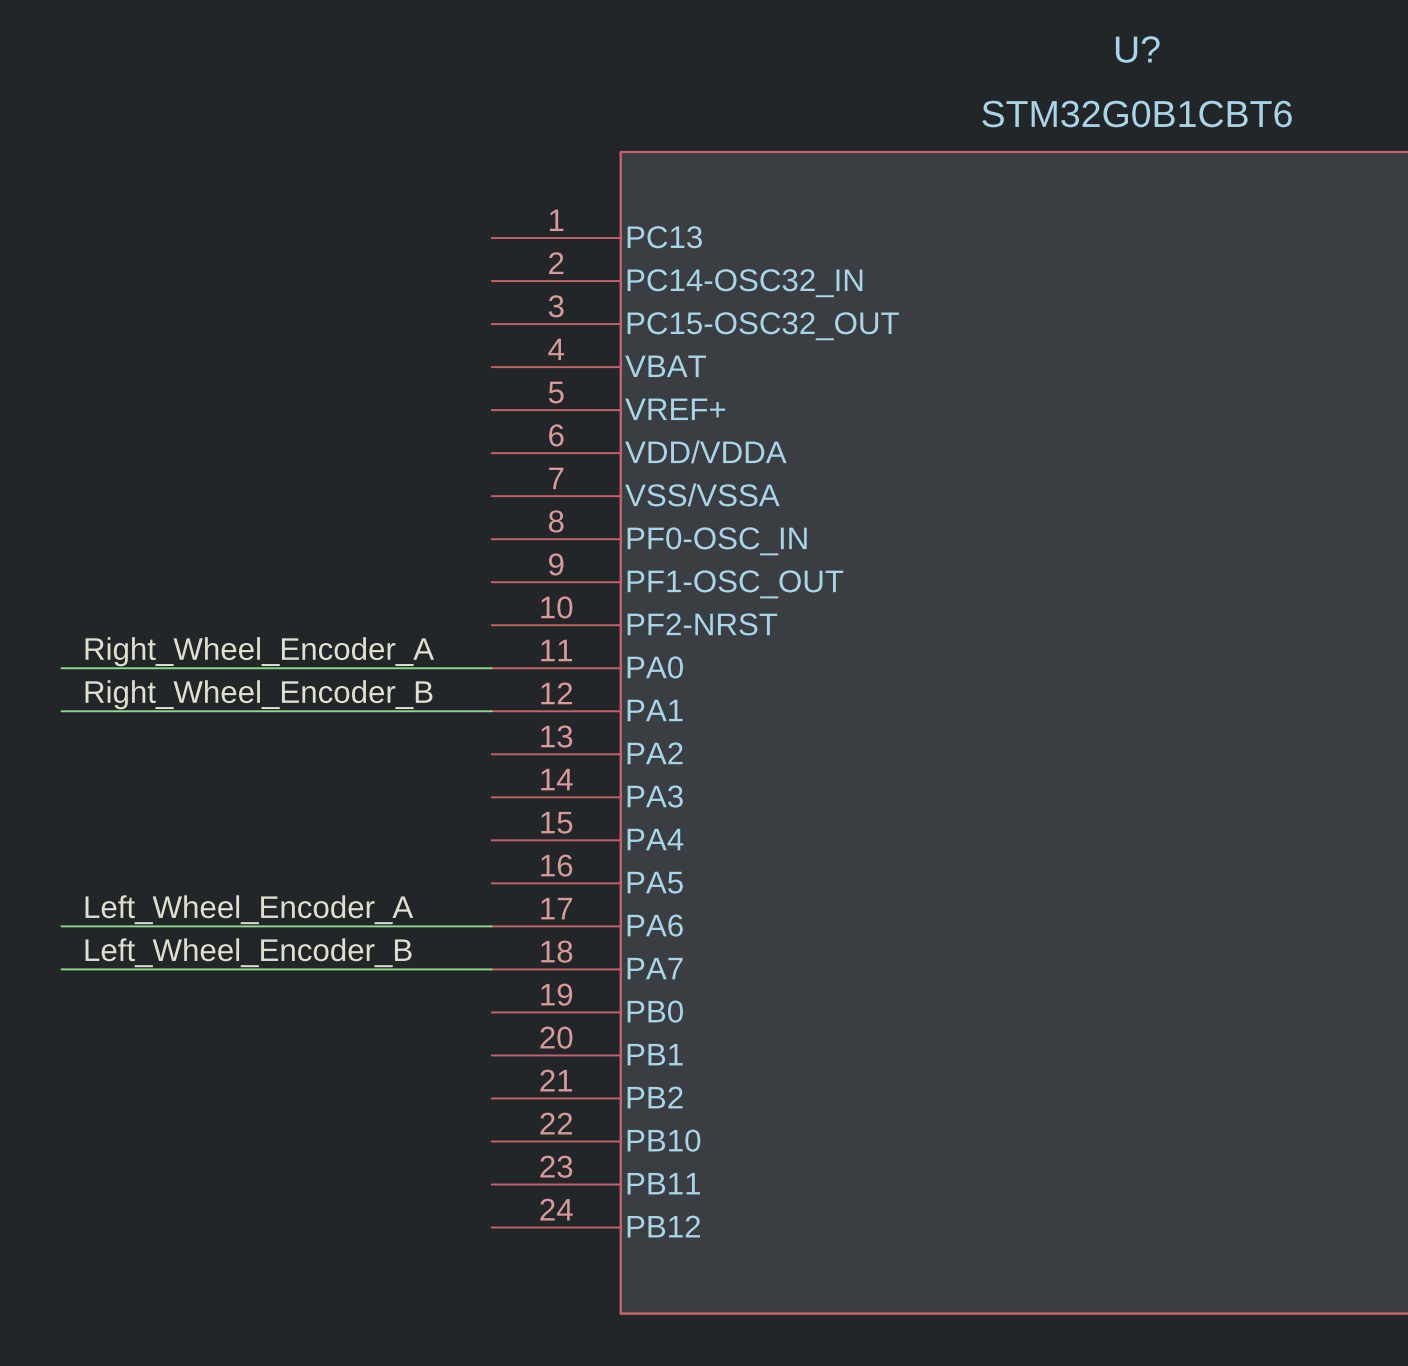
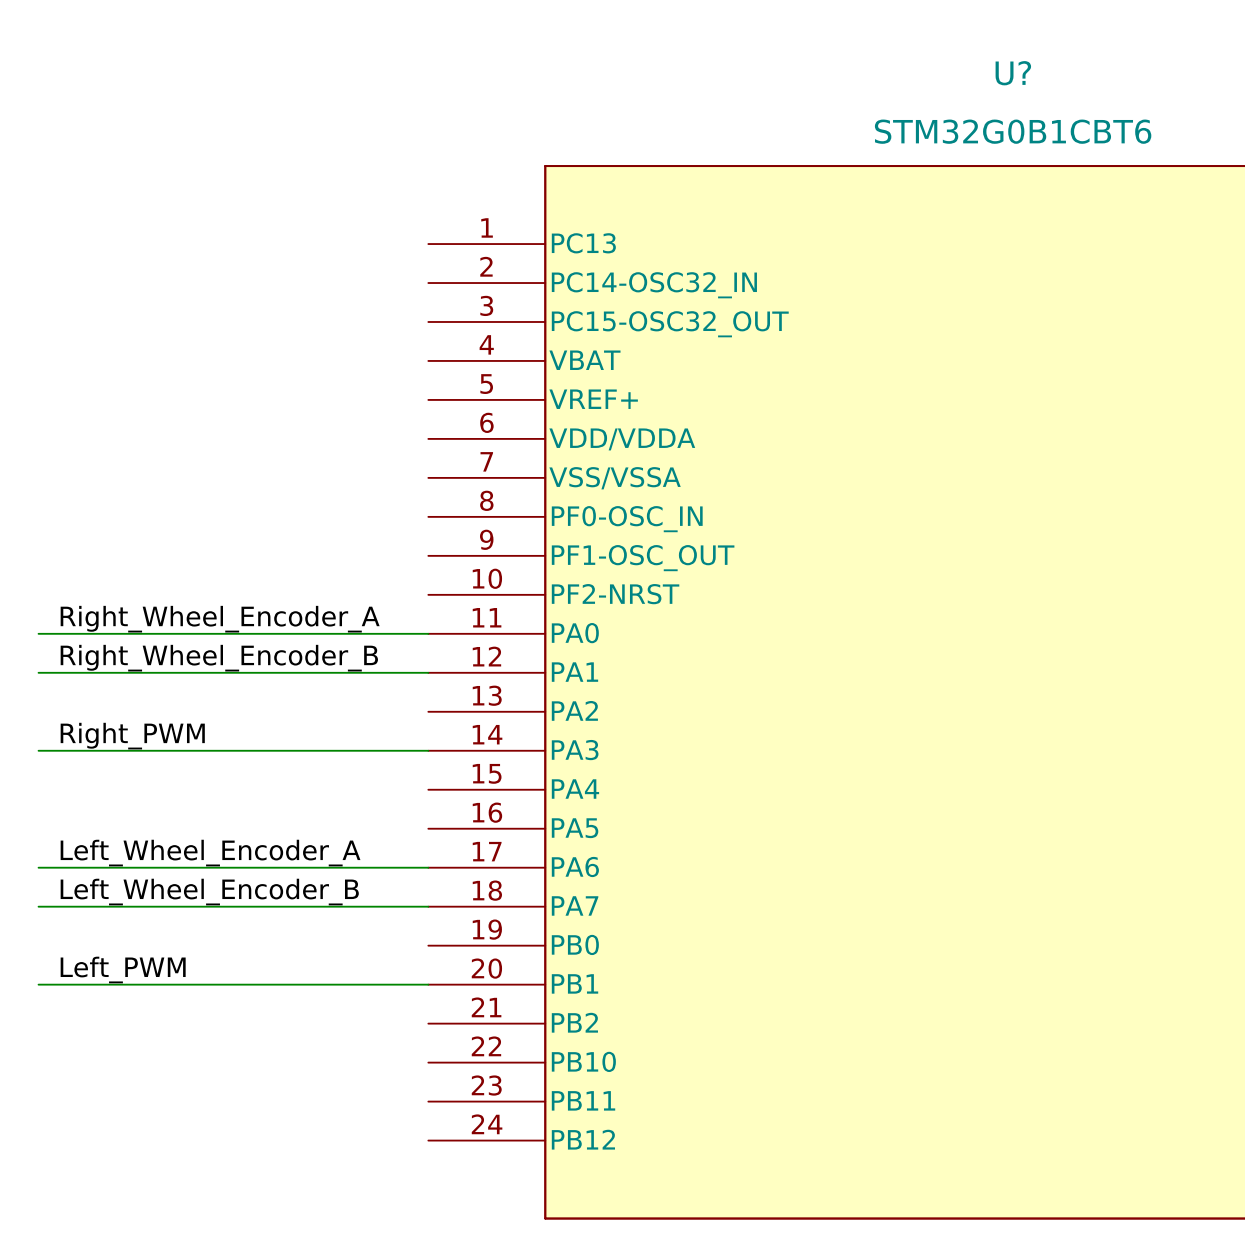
label: none -> Right_PWM (132, 736)
wire: none -> (38, 750) (428, 750)
label: none -> Left_PWM (123, 970)
wire: none -> (38, 984) (428, 984)

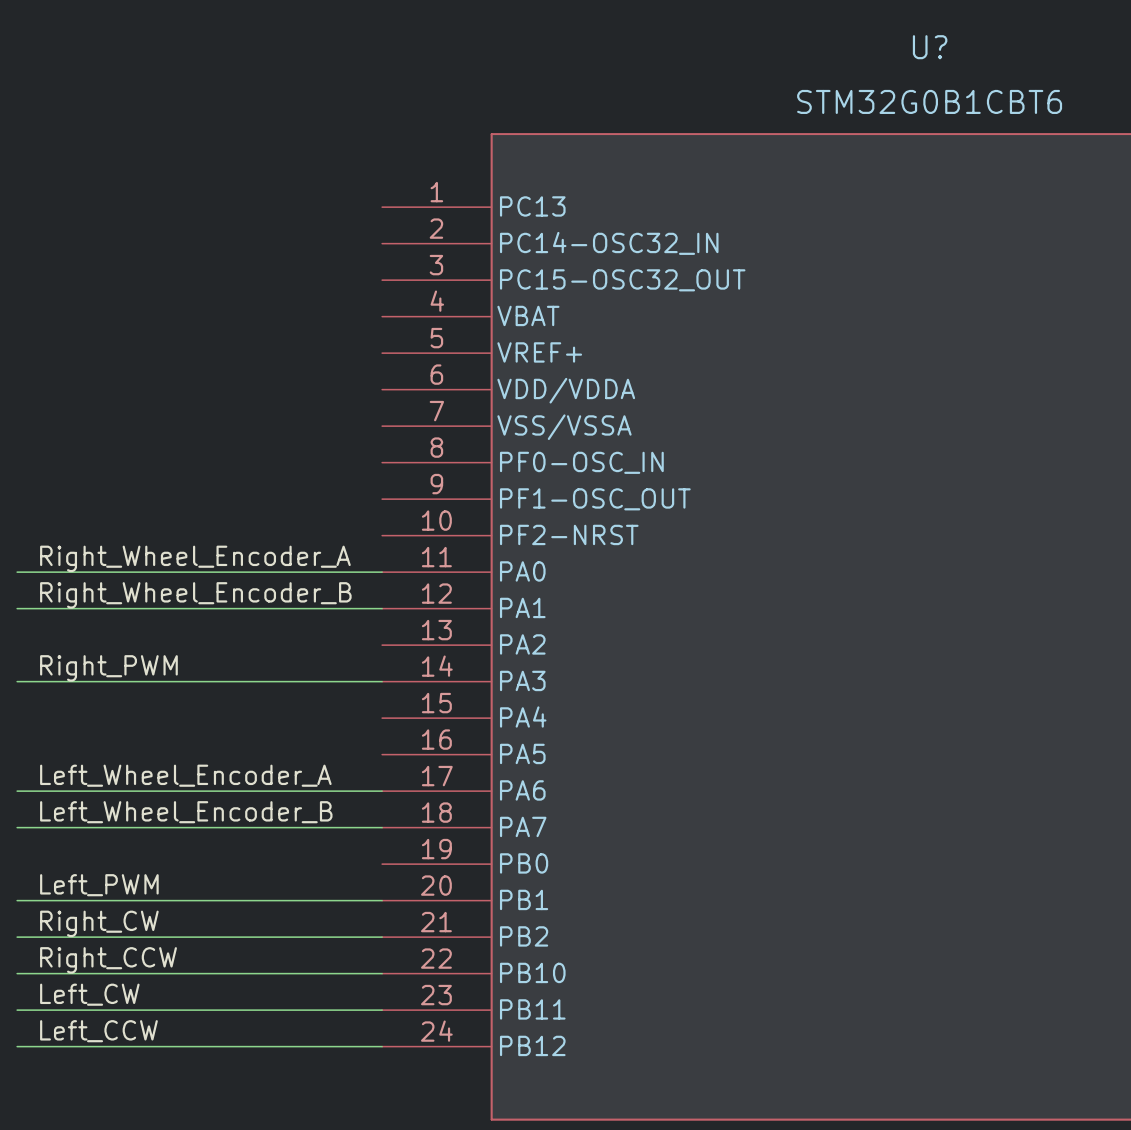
label: none -> Right_CW (99, 923)
wire: none -> (17, 937) (382, 937)
label: none -> Right_CCW (108, 960)
wire: none -> (17, 973) (382, 973)
label: none -> Left_CW (89, 994)
wire: none -> (17, 1010) (382, 1010)
label: none -> Left_CCW (98, 1031)
wire: none -> (17, 1046) (382, 1046)

